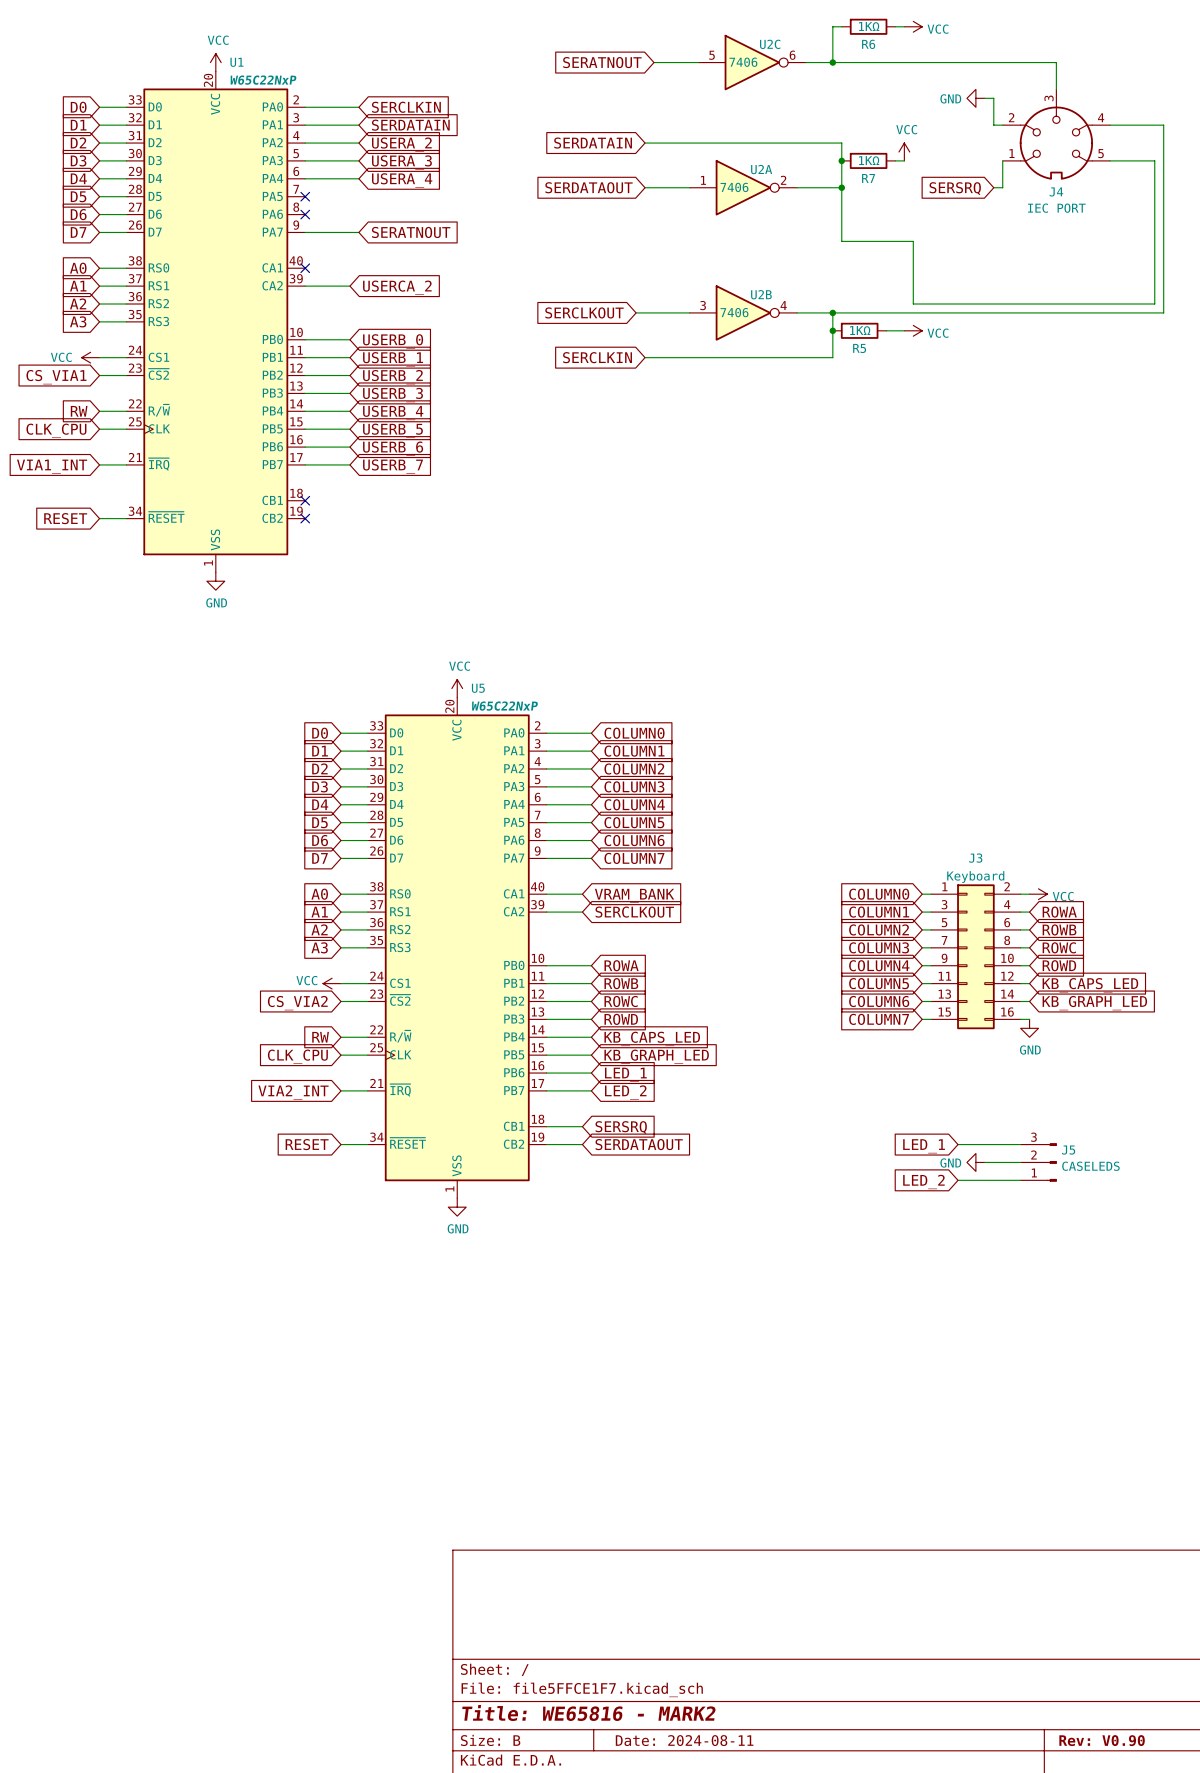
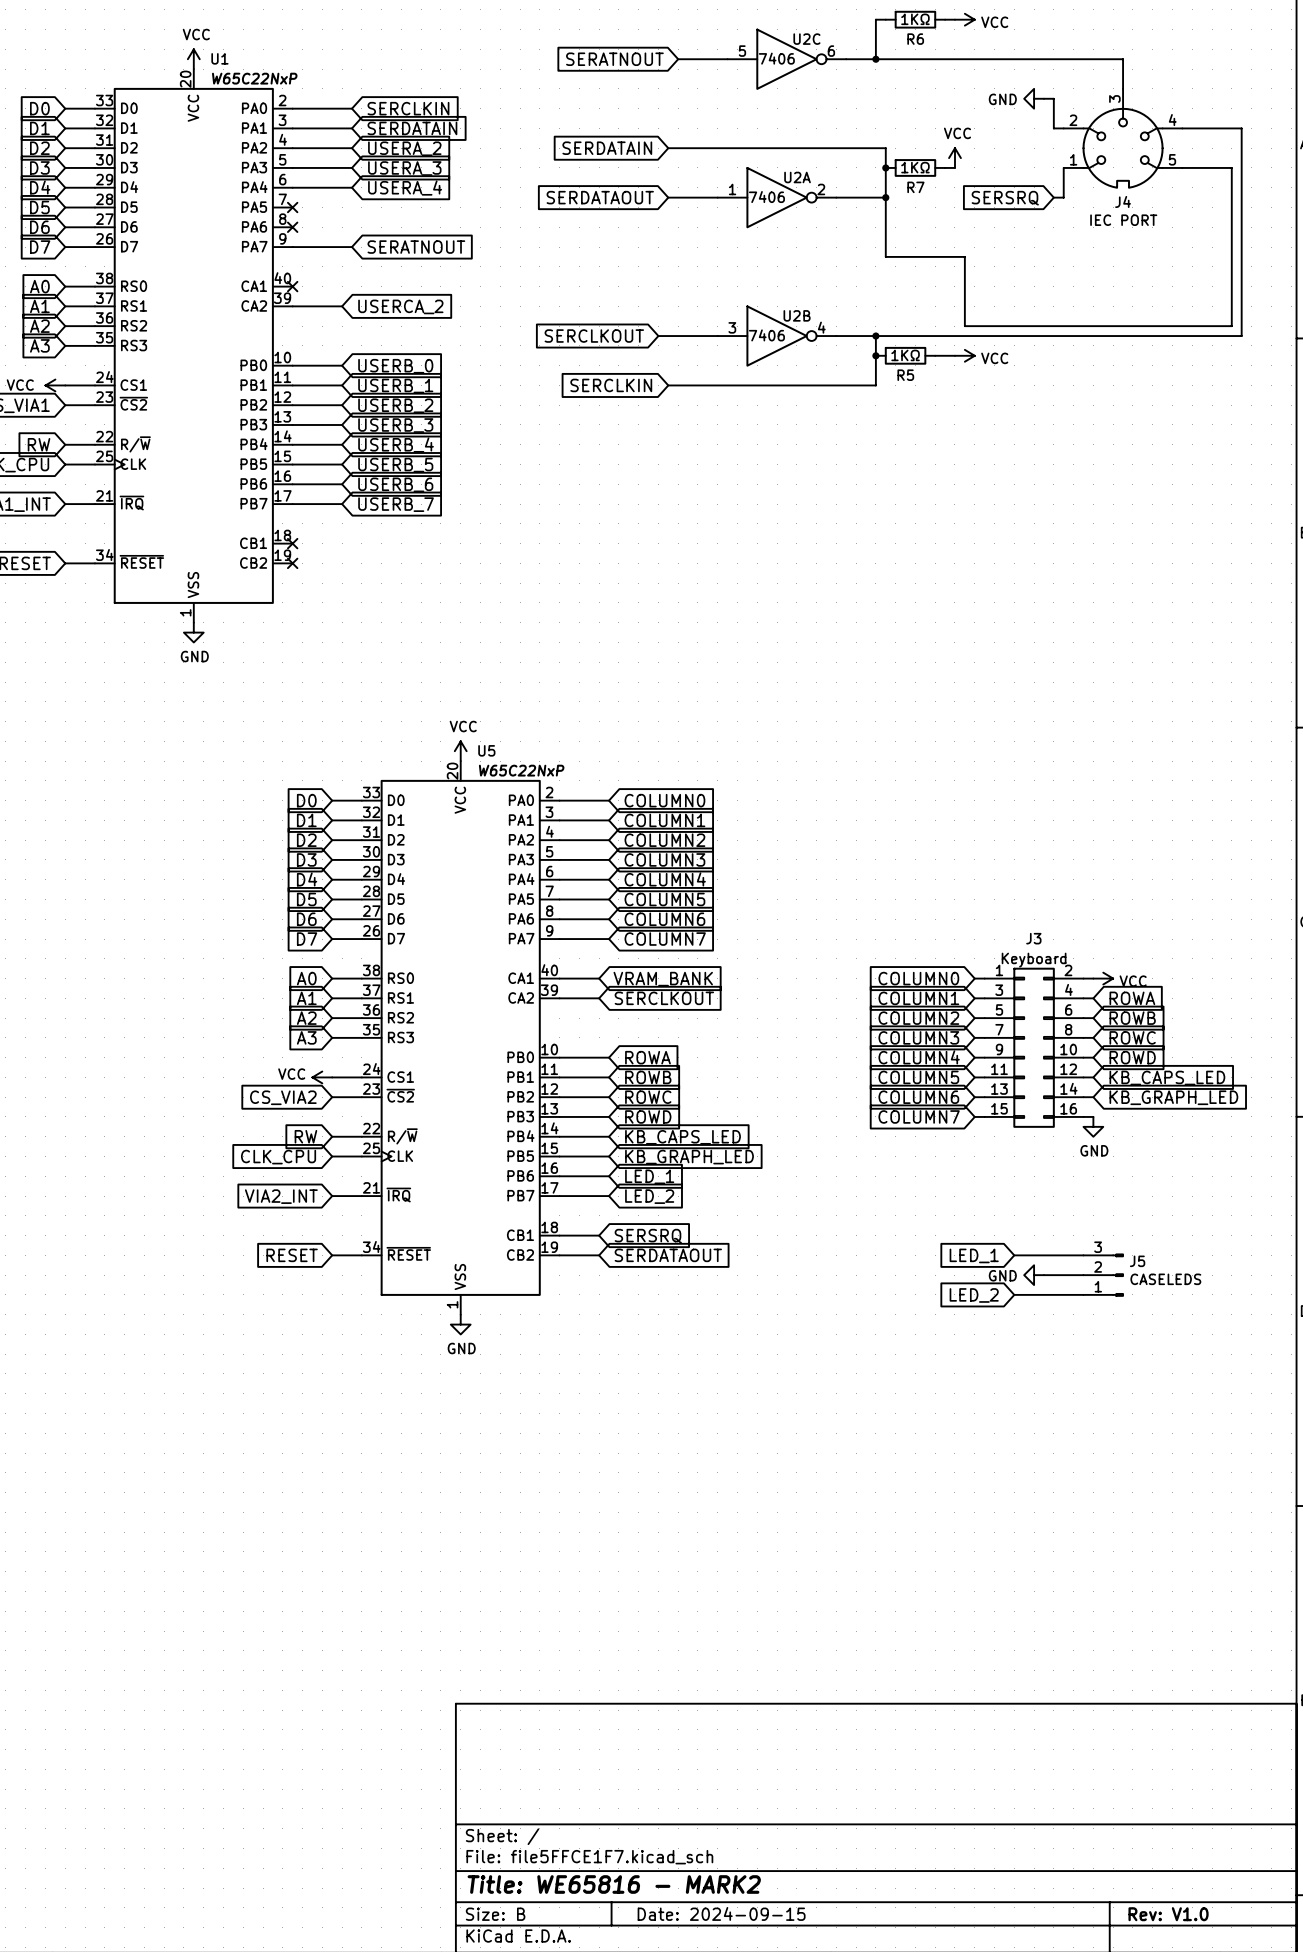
title block: Date: 2024-08-11 (684, 1740) -> Date: 2024-09-15 (721, 1913)
title block: Rev: V0.90 (1102, 1740) -> Rev: V1.0 (1168, 1914)

